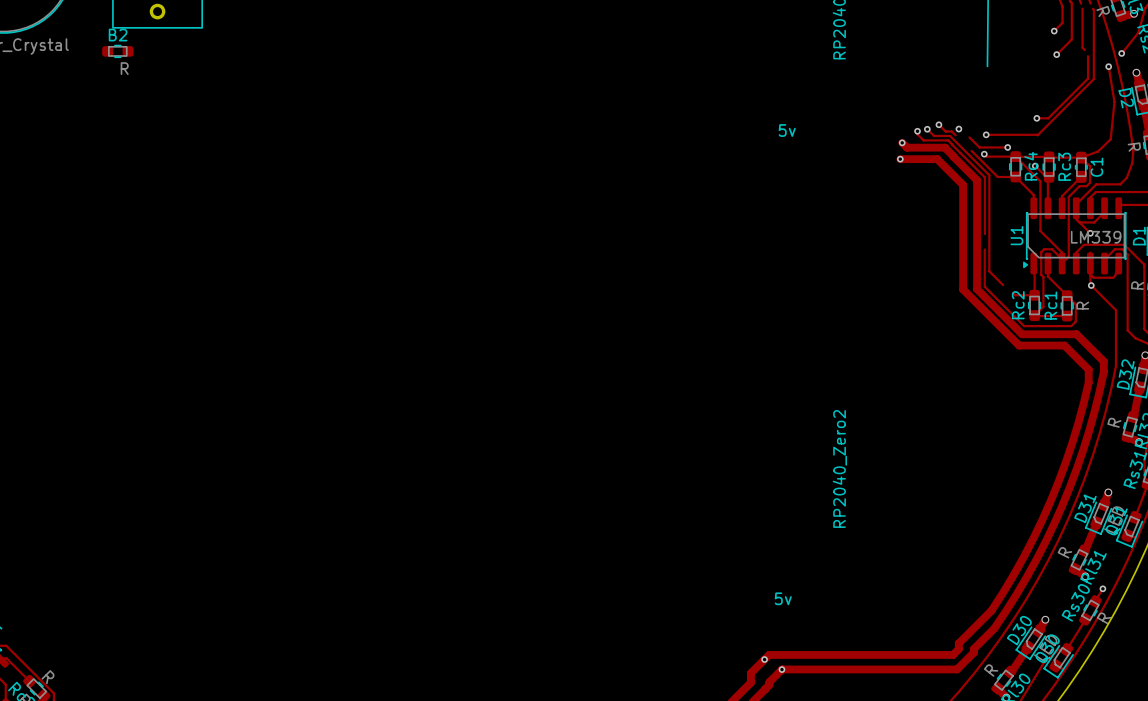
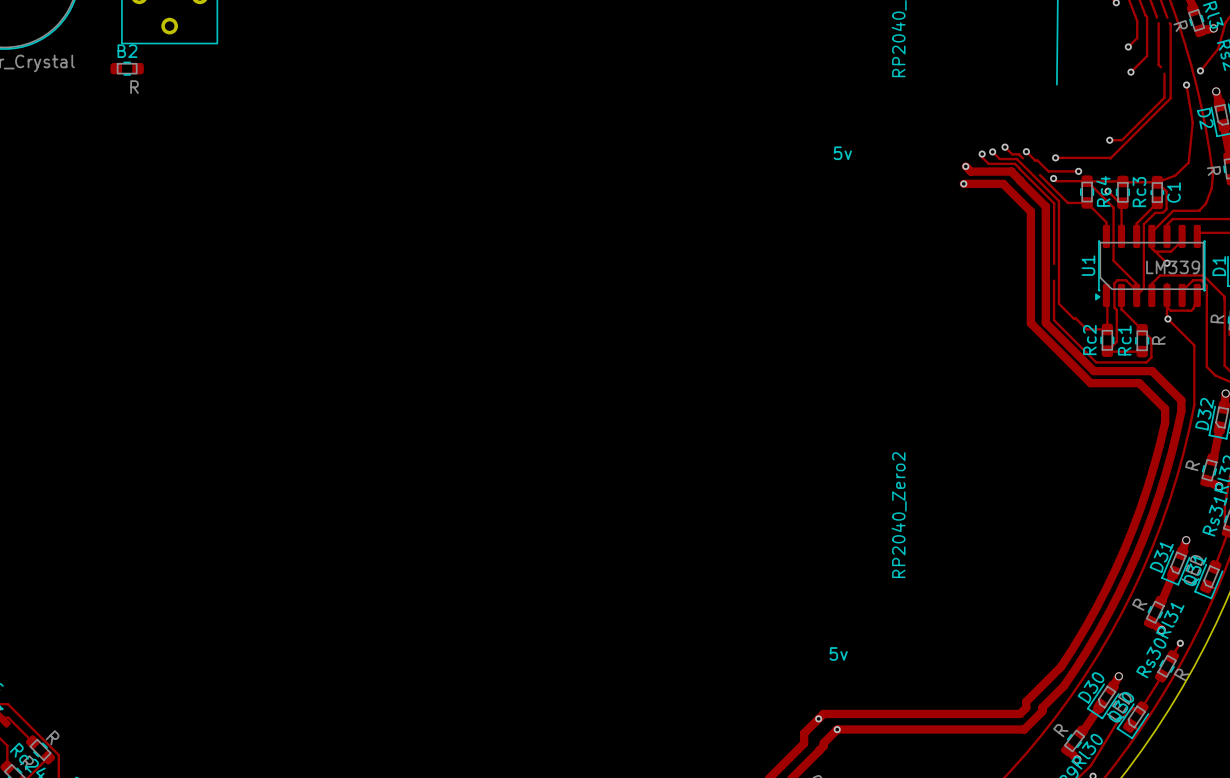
track: none -> (1026, 151) (1037, 160)
track: none -> (1073, 318) (1084, 326)

